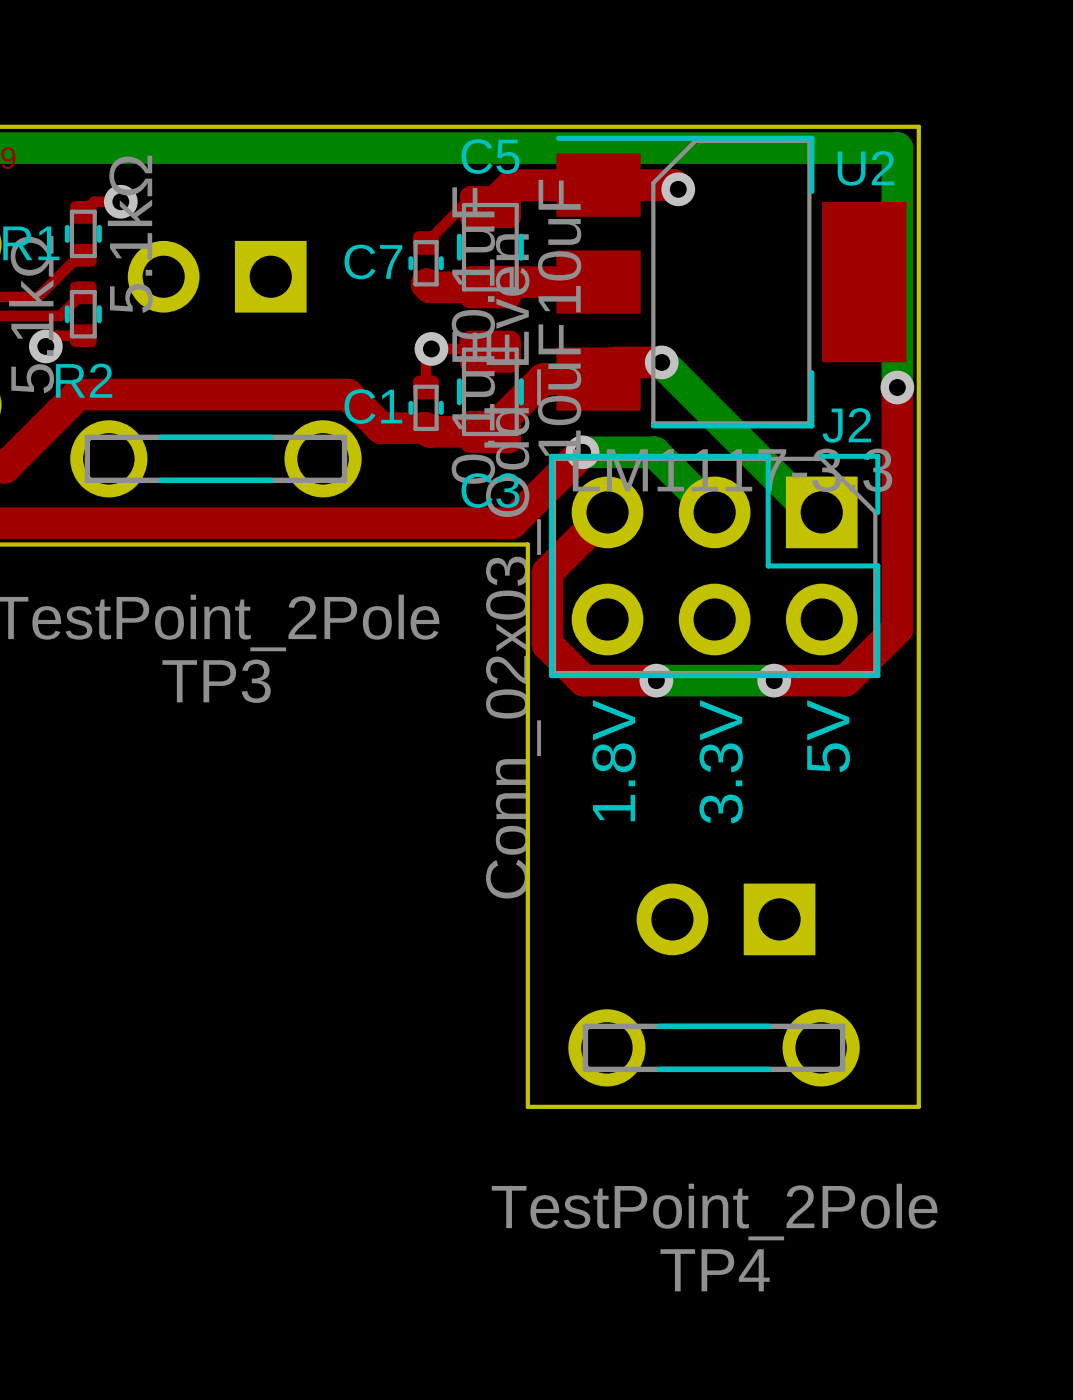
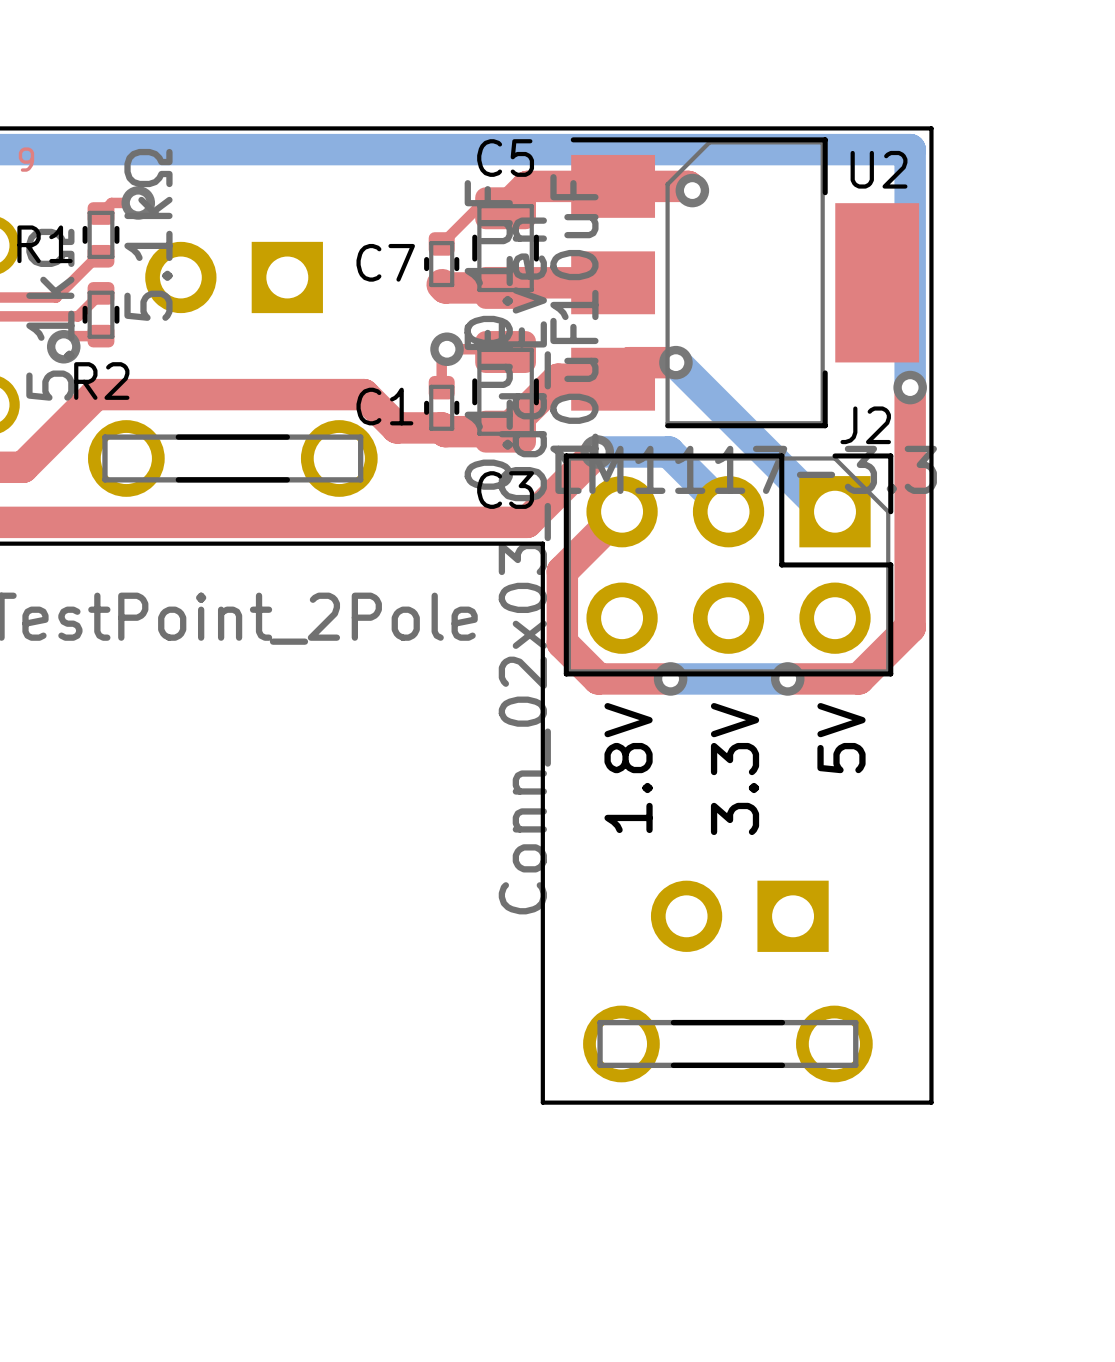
TP3 name: TP3 (216, 681) -> none
TP4 value: TestPoint_2Pole (714, 1212) -> none
TP4 name: TP4 (715, 1270) -> none

